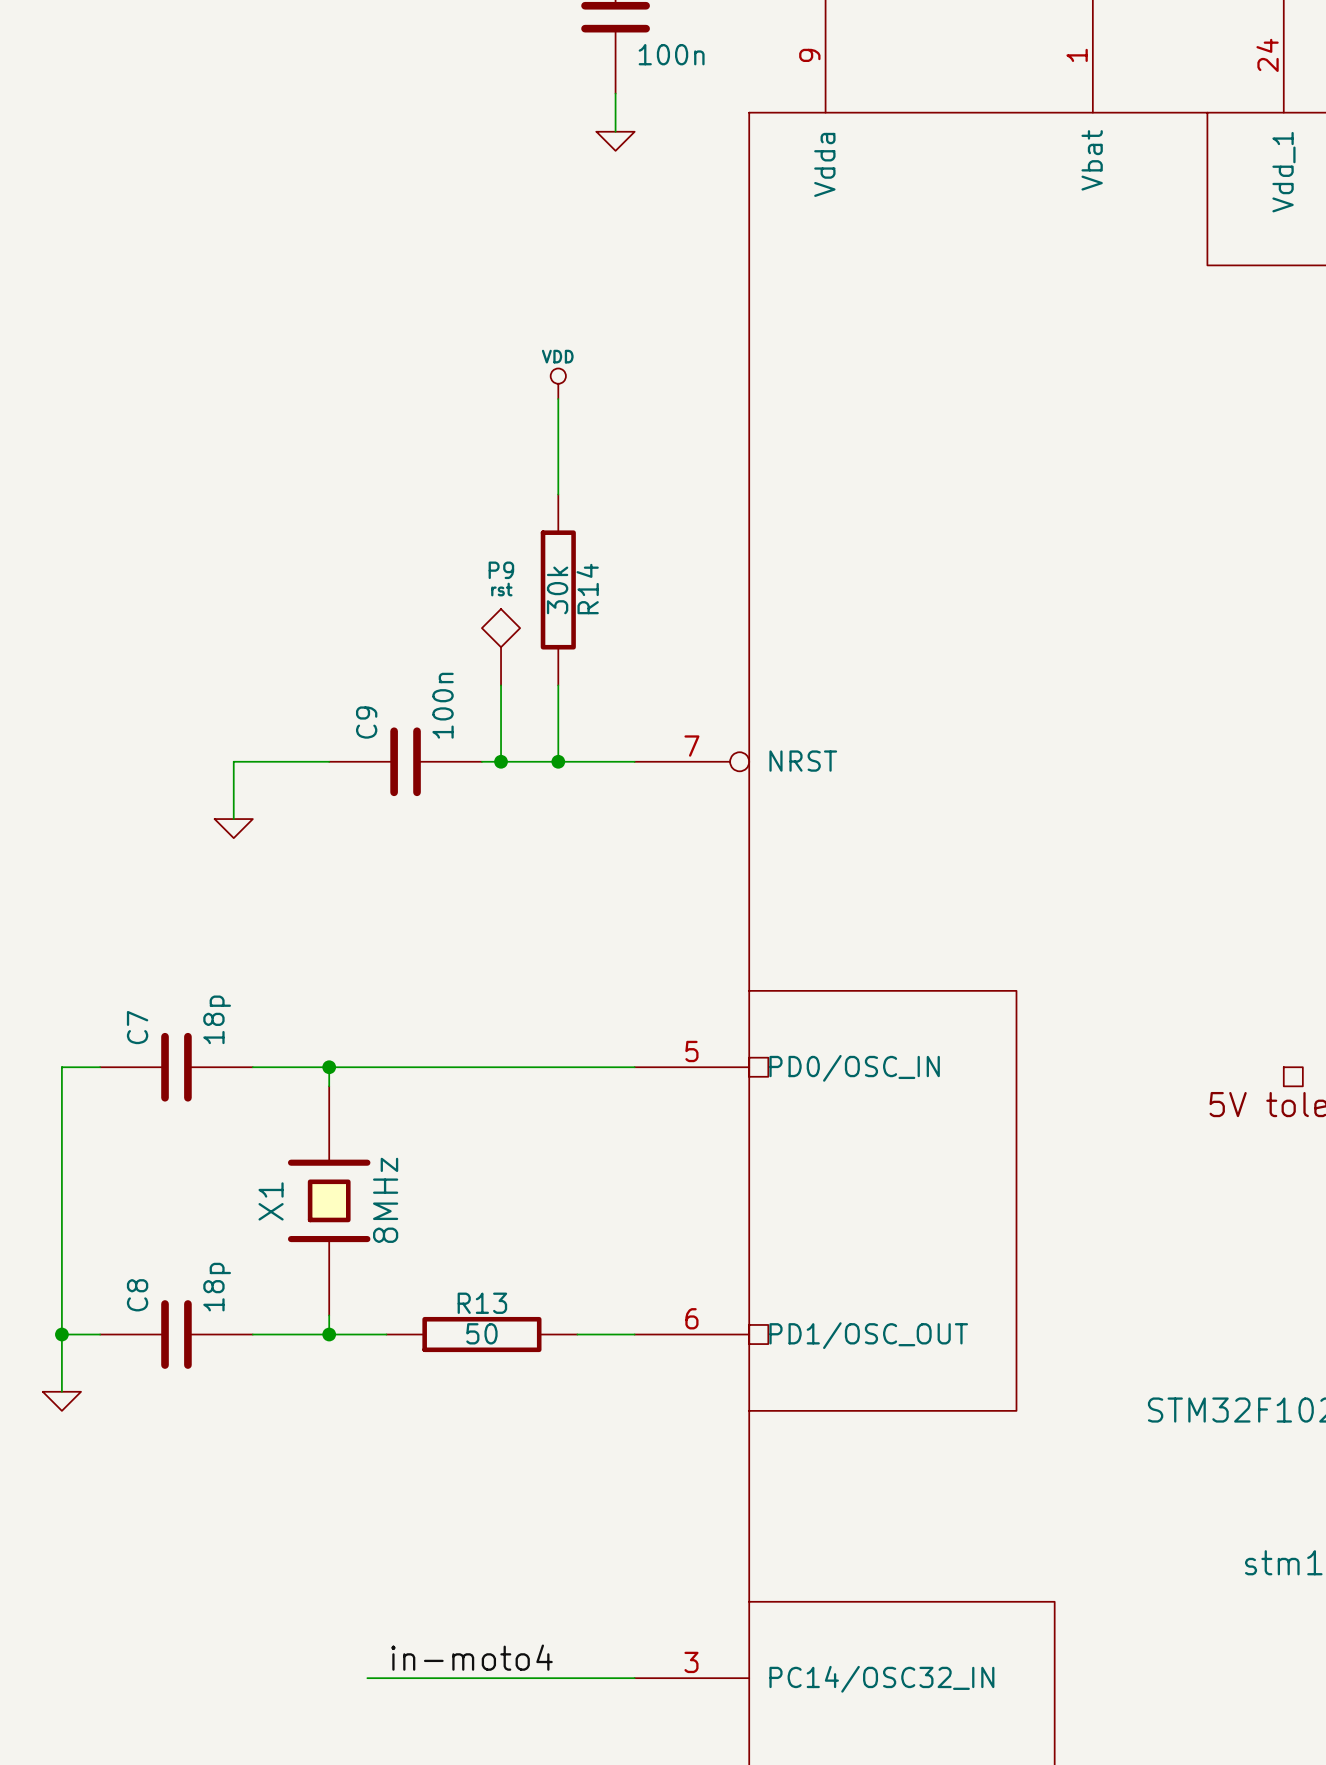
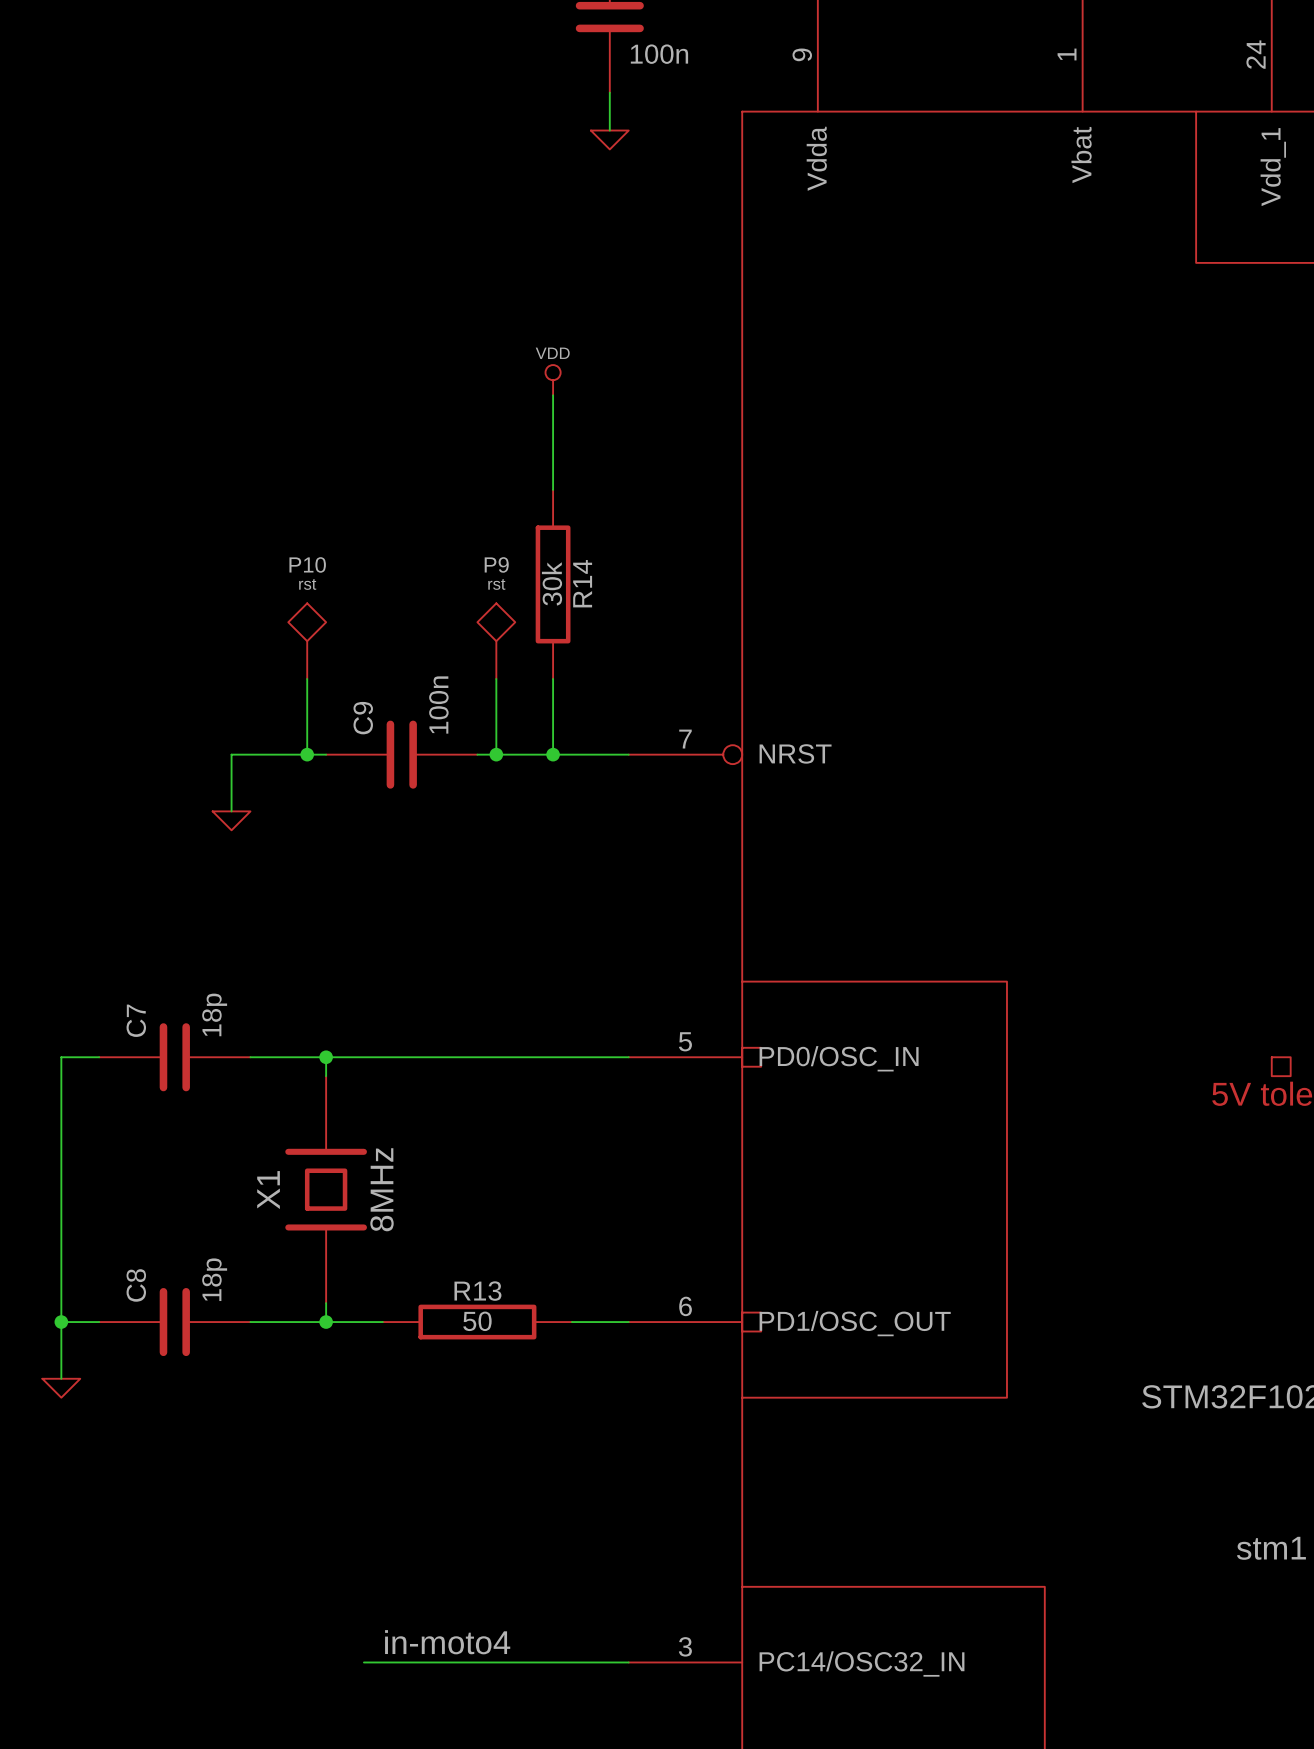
P10: none -> rst (307, 641)
wire: none -> (307, 679) (307, 754)
junction: none -> (307, 754)

